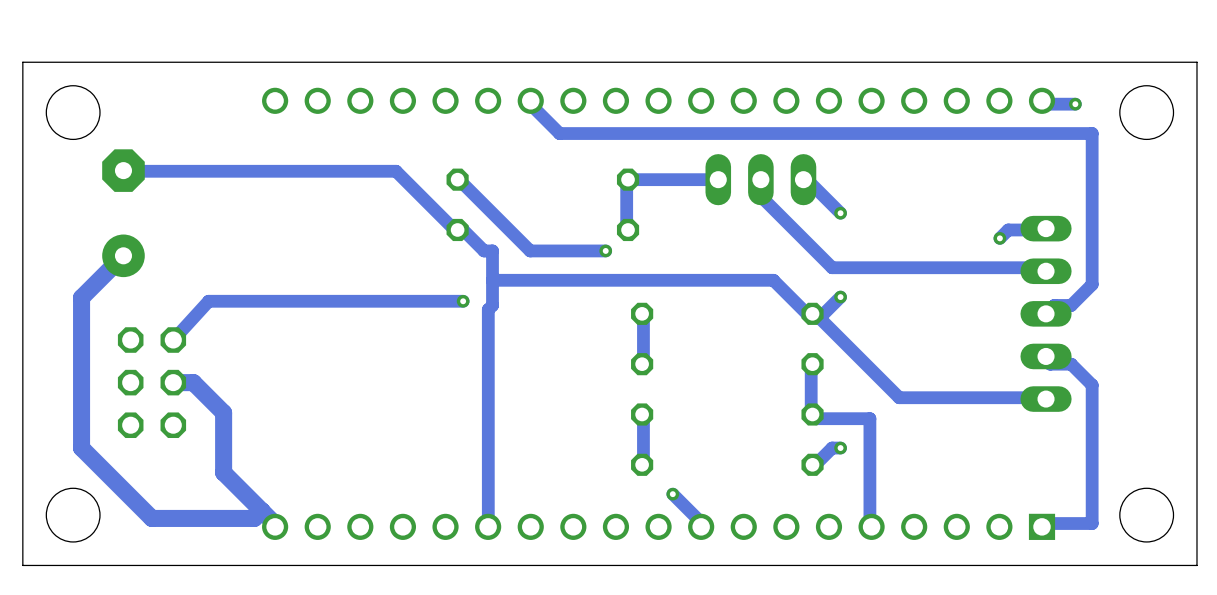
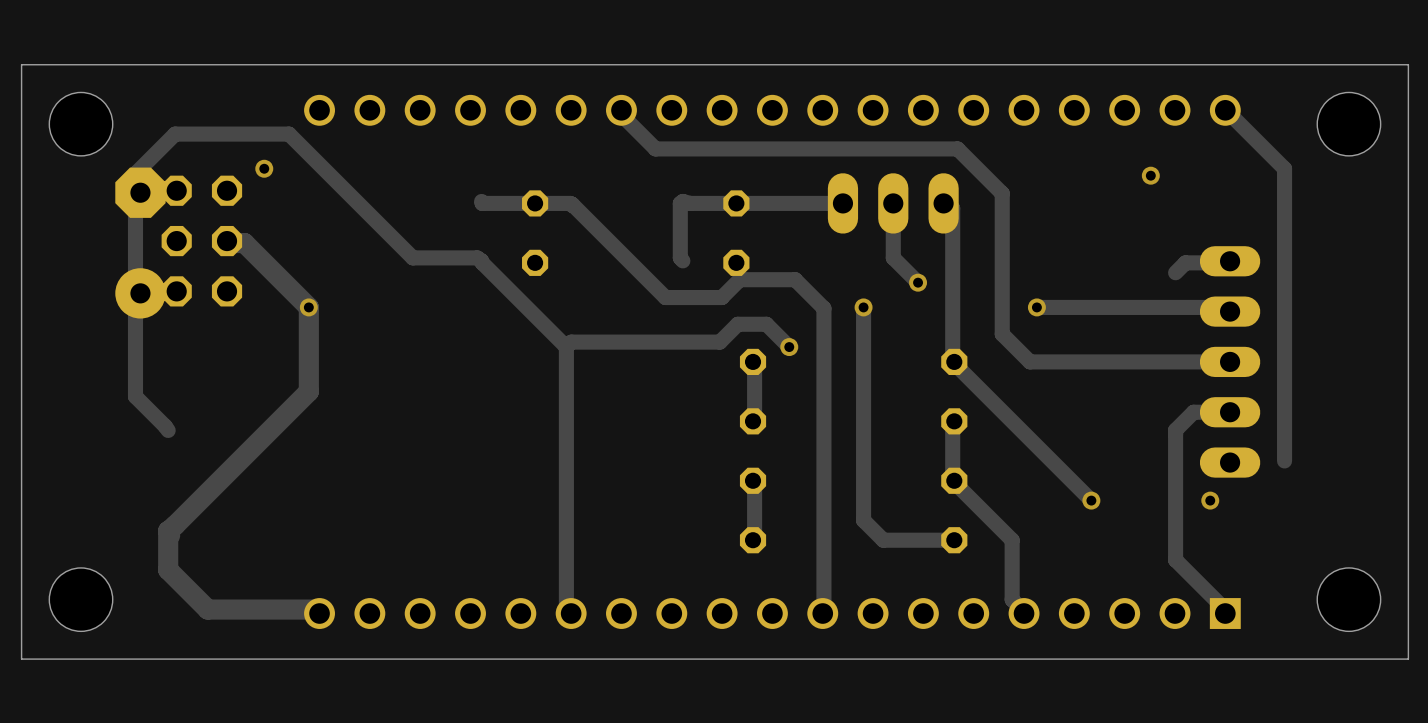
track: (1075, 104) (1046, 104) -> (1284, 168) (1230, 114)
via: (1075, 104) -> none
track: (815, 133) (1092, 133) (1092, 150) -> (957, 148) (1002, 193) (1002, 334) (1029, 361) (1230, 361)
via: none -> (264, 168)
via: none -> (1150, 175)
track: (123, 170) (396, 171) (454, 229) (463, 229) (484, 250) (492, 250) (492, 305) (488, 309) (488, 526) -> (566, 347) (566, 609) (571, 613)
track: none -> (481, 201) (482, 203) (535, 203)
track: (458, 179) (530, 250) (605, 250) -> (536, 203) (572, 204) (665, 297) (721, 297) (739, 279) (795, 279) (823, 308) (823, 609)
track: (626, 179) (628, 229) -> (734, 203) (690, 203) (682, 201) (680, 203) (680, 257) (682, 260)
track: (811, 183) (840, 213) -> (952, 208) (952, 361)
track: (760, 196) (832, 267) (882, 267) -> (893, 223) (893, 257) (918, 282)
track: none -> (227, 241) (229, 243) (244, 243) (308, 307) (308, 391) (168, 531)
via: (840, 213) -> none
via: (999, 238) -> none
via: none -> (918, 282)
via: (605, 250) -> none
track: (123, 255) (81, 297) (81, 448) (151, 518) (254, 518) (261, 510) -> none
via: none -> (308, 307)
via: none -> (863, 307)
via: none -> (1036, 307)
track: (492, 280) (773, 280) (807, 313) (811, 313) -> none
track: (1092, 284) (1071, 305) (1054, 305) (1046, 313) -> (1284, 327) (1284, 446)
track: (840, 297) (819, 318) -> none
via: (840, 297) -> none
track: (463, 301) (208, 301) (173, 340) -> none
via: (463, 301) -> none
track: none -> (566, 347) (477, 257) (412, 257) (289, 134) (175, 134) (135, 173) (135, 396) (168, 430)
track: none -> (789, 347) (766, 324) (737, 324) (719, 342) (571, 342) (566, 347)
via: none -> (789, 347)
track: (812, 313) (815, 313) (899, 397) (1046, 397) -> (954, 361) (1091, 500)
track: (1046, 356) (1046, 359) (1050, 364) (1071, 364) (1092, 385) -> none
part position: (152, 382) -> (201, 241)
track: (173, 382) (193, 382) (223, 412) (223, 472) (275, 524) -> none
track: (1092, 397) (1092, 523) (1046, 523) (1042, 526) -> (1230, 412) (1193, 412) (1175, 430) (1175, 560) (1225, 609) (1225, 613)
track: (815, 418) (869, 418) (869, 523) -> (957, 485) (1012, 540) (1012, 599) (1022, 609)
via: none -> (1091, 500)
via: none -> (1210, 500)
track: (840, 448) (832, 448) (815, 464) (812, 464) -> (863, 307) (863, 520) (883, 540) (954, 540)
via: (840, 448) -> none
track: none -> (168, 531) (168, 569) (207, 609) (318, 609) (319, 613)
track: (672, 494) (702, 523) -> none
via: (672, 494) -> none

